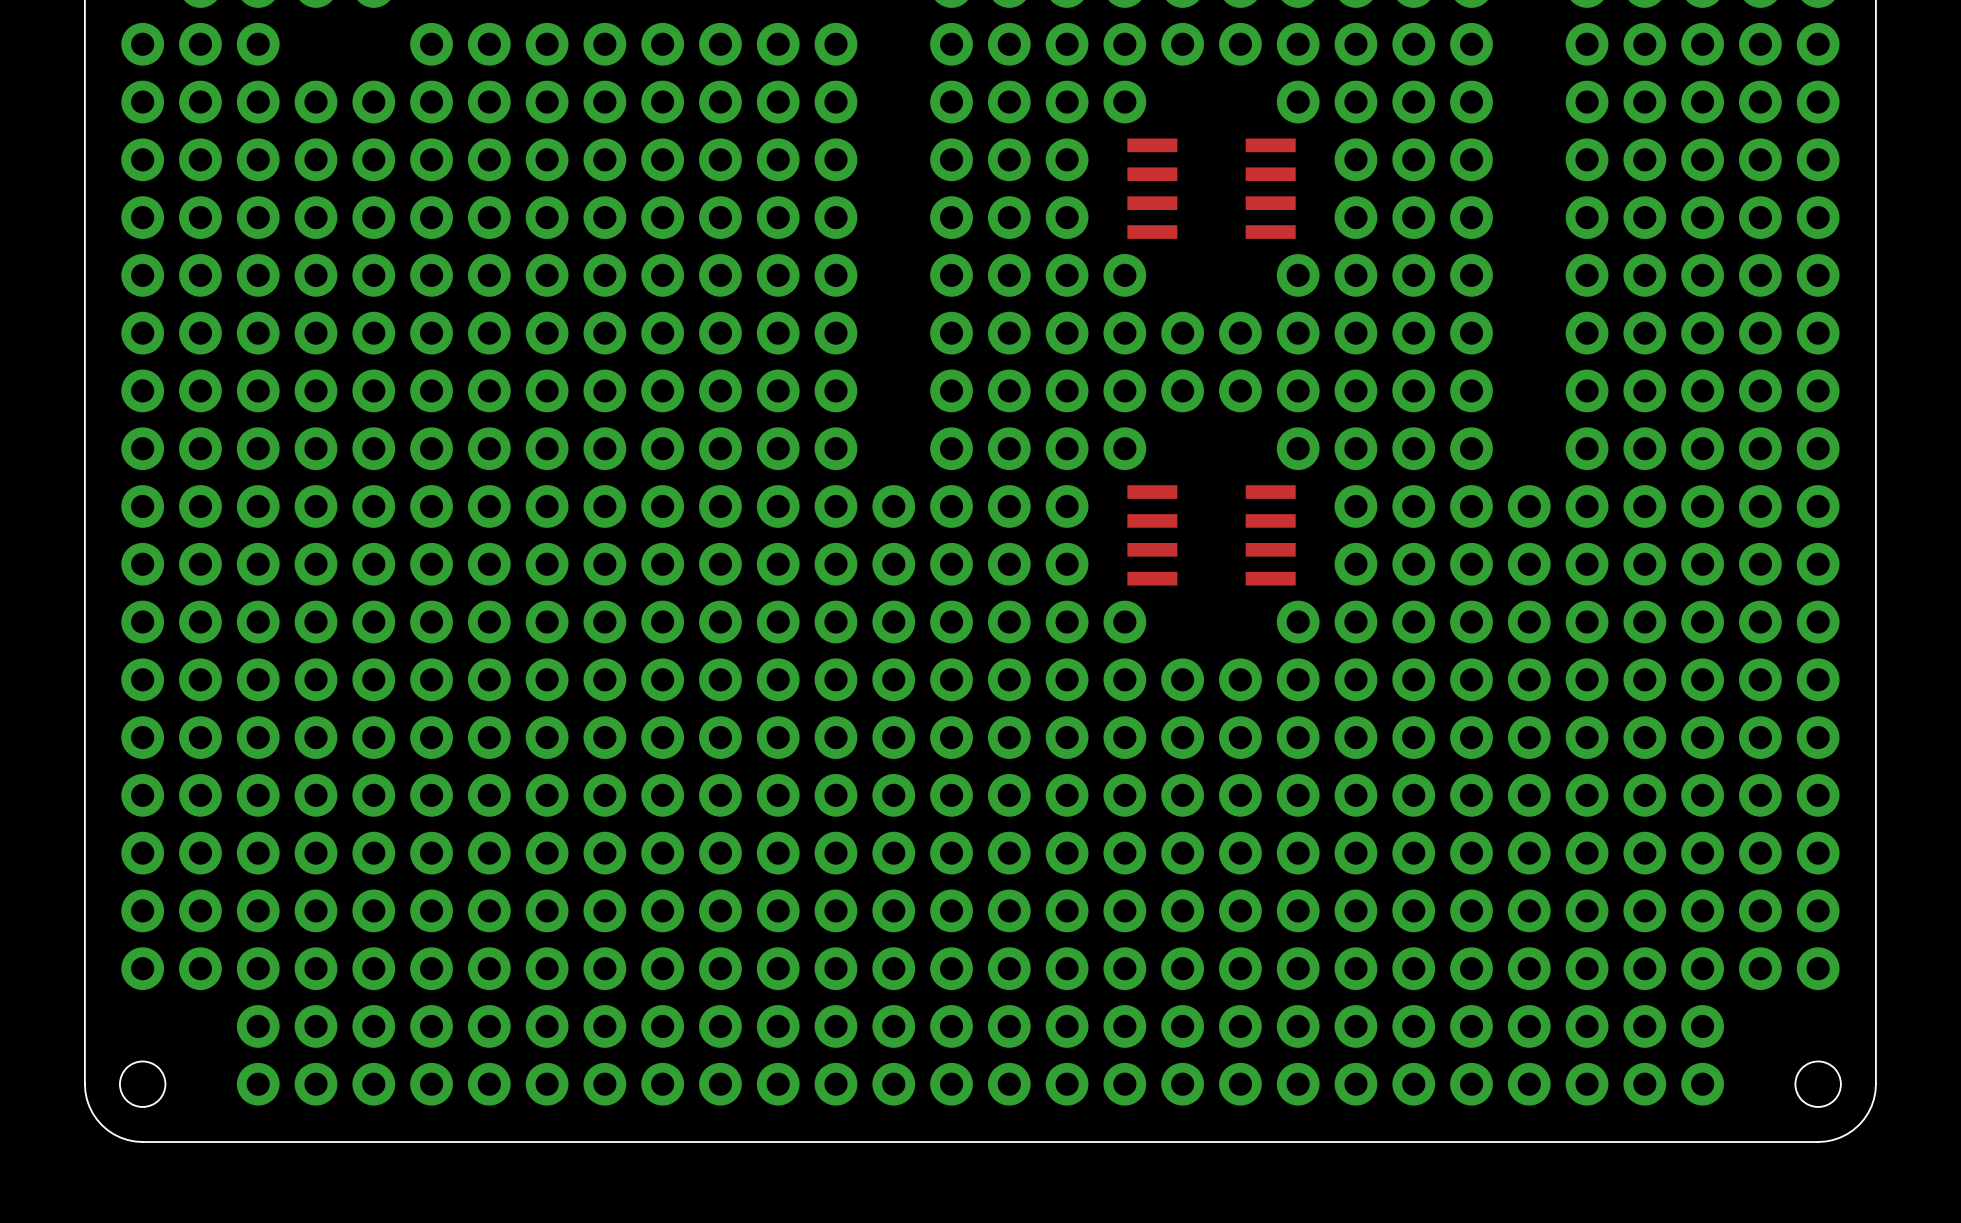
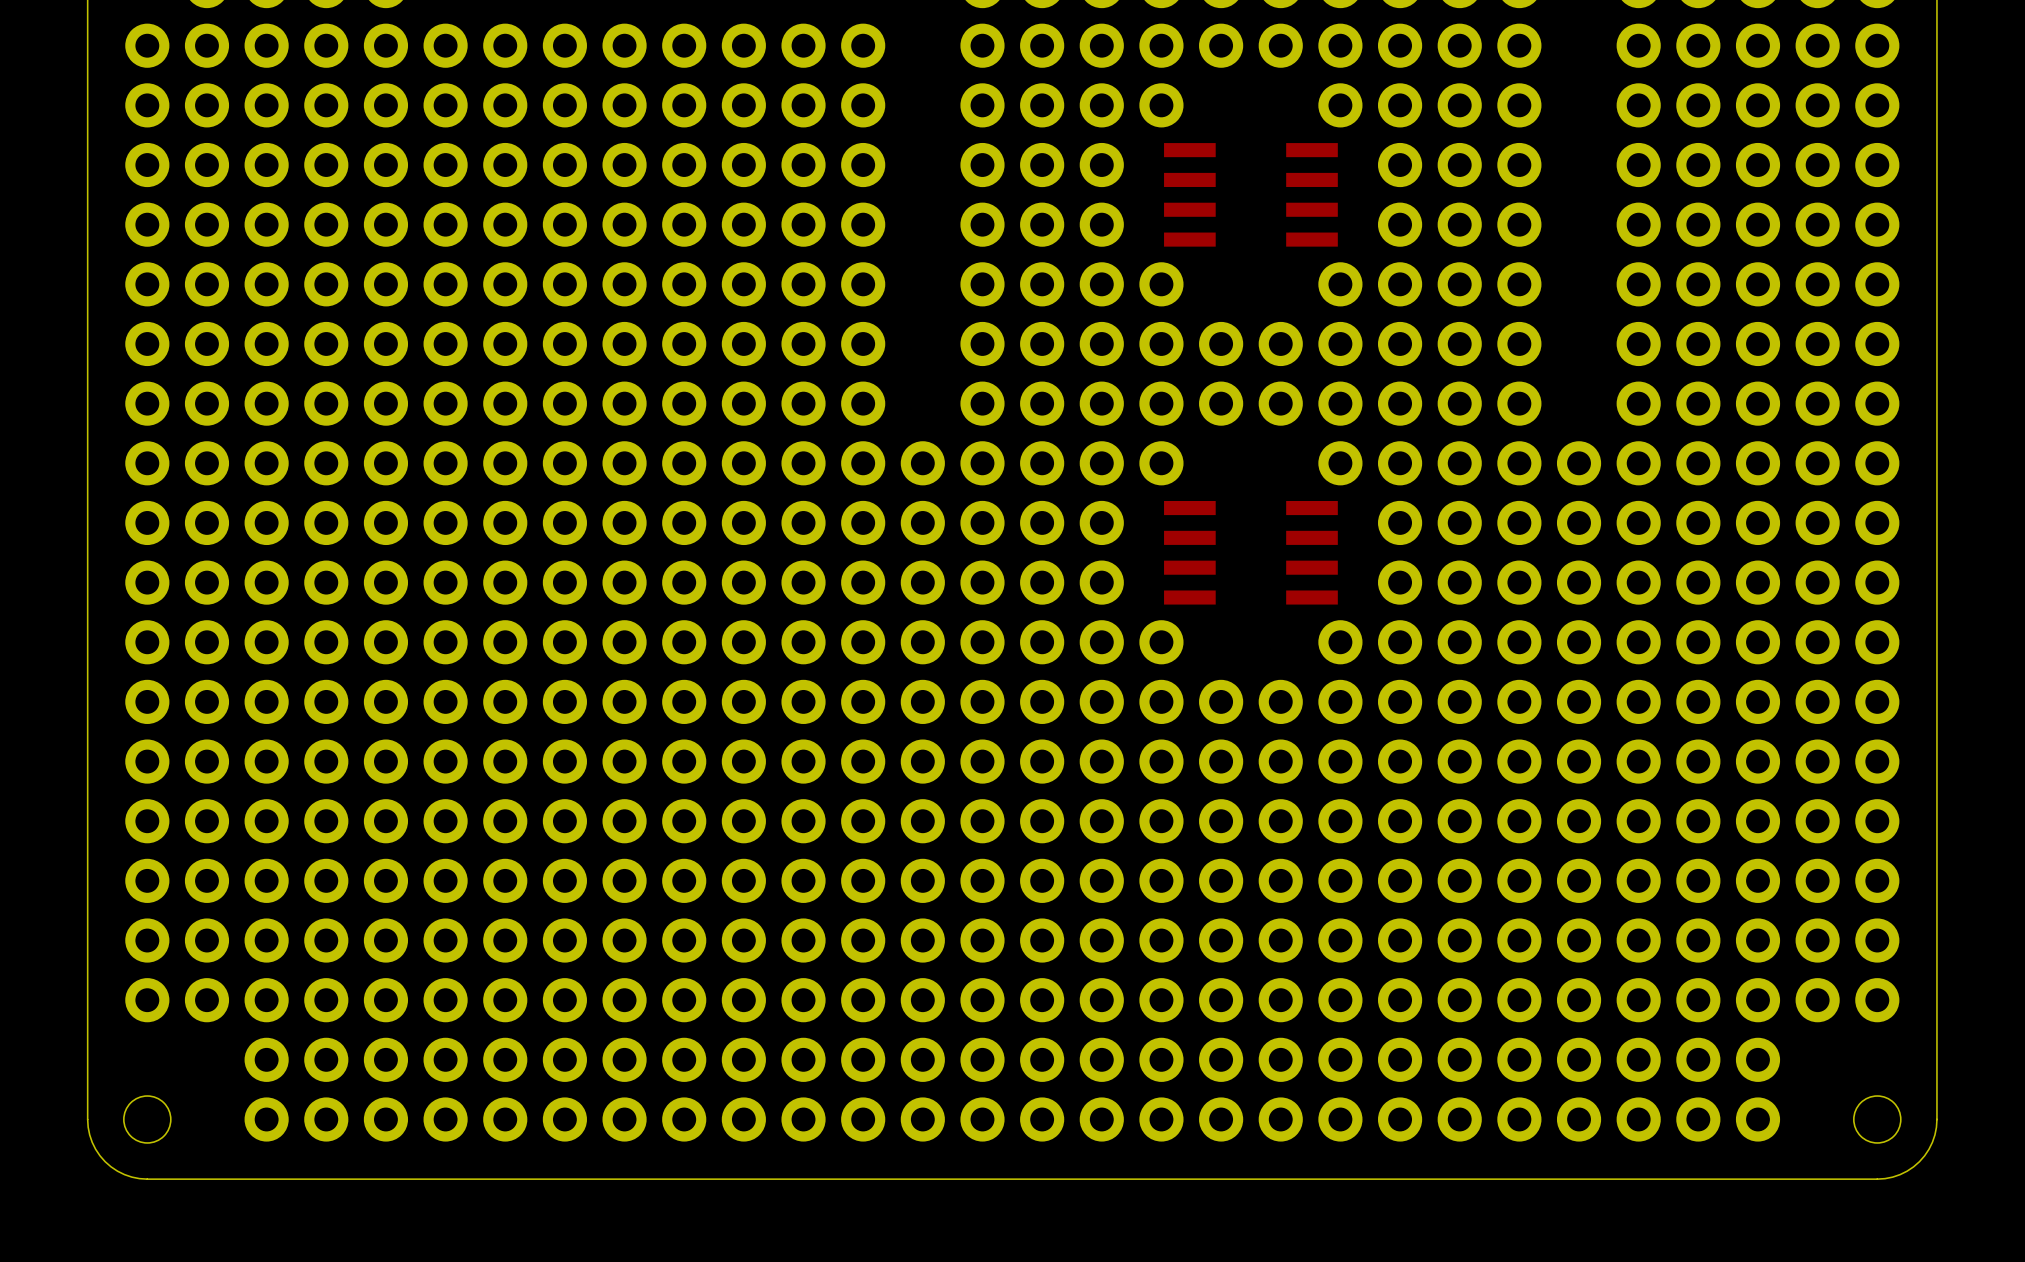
part: none -> (326, 45)
part: none -> (385, 45)
part: none -> (922, 791)
part: none -> (1579, 791)

